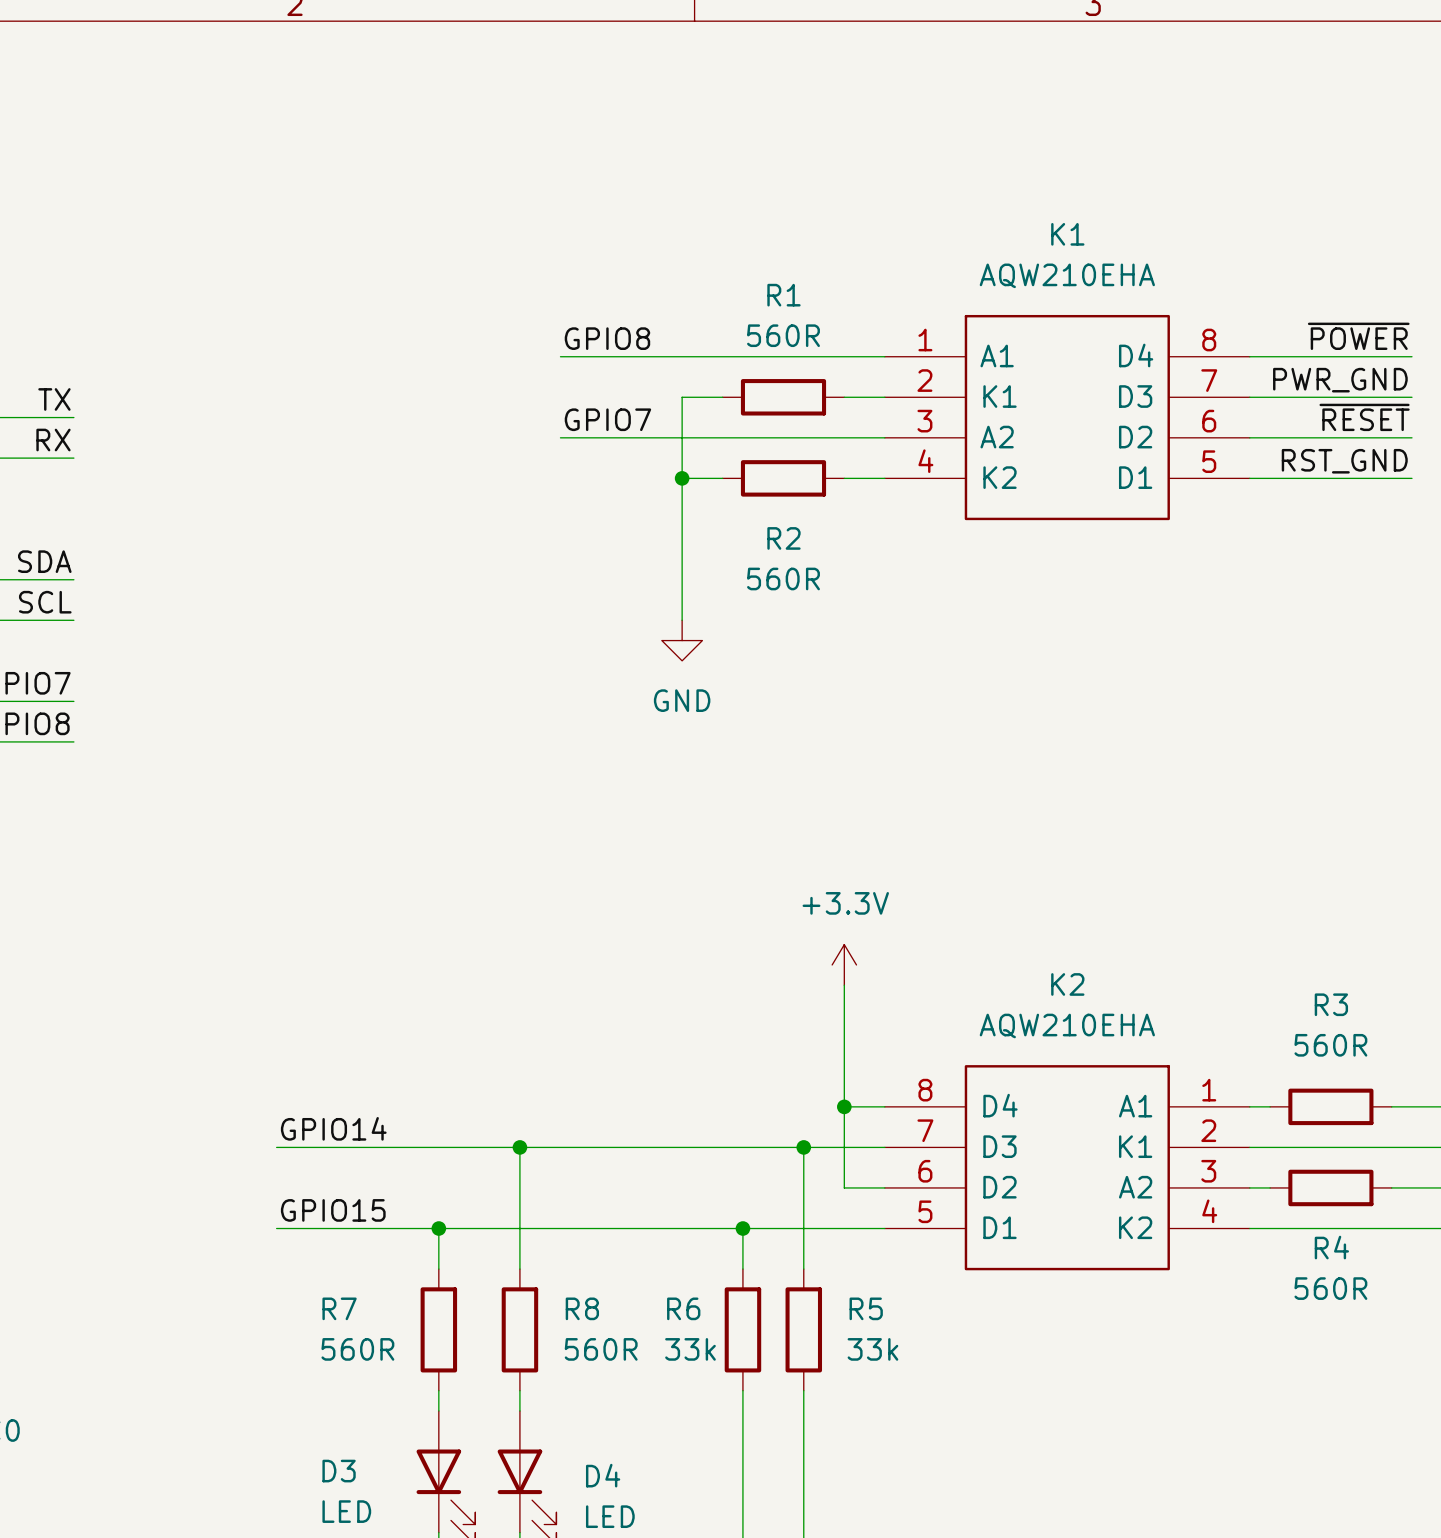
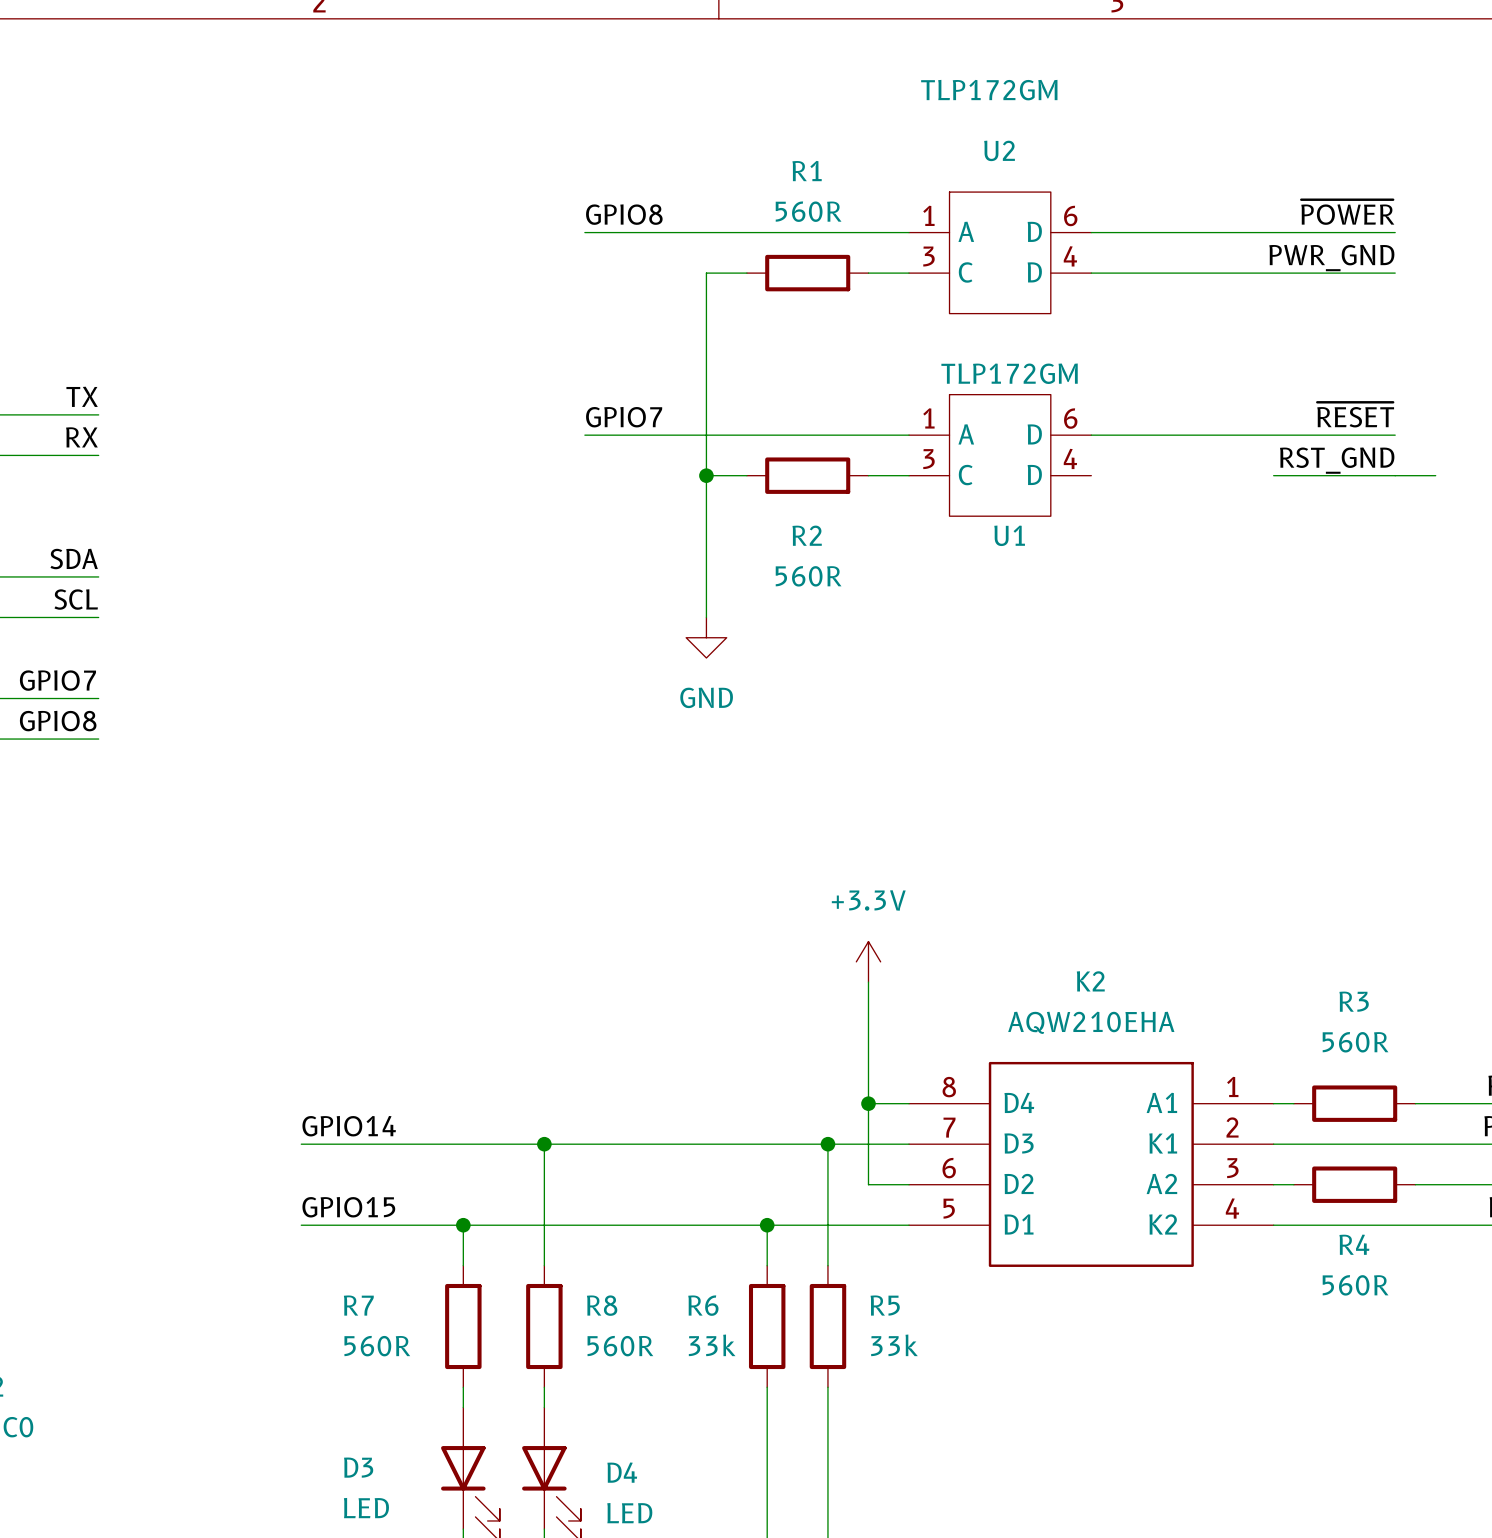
wire: none -> (1091, 232) (1395, 232)
U2: none -> TLP172GM (1000, 252)
wire: none -> (1091, 273) (1395, 273)
label position: ~{POWER} (1358, 336) -> ~{POWER} (1347, 212)
label position: GPIO8 (607, 338) -> GPIO8 (624, 214)
wire: (560, 356) (884, 356) -> (584, 232) (909, 232)
wire: (1249, 356) (1411, 356) -> none
label position: PWR_GND (1340, 380) -> PWR_GND (1331, 258)
wire: (682, 397) (722, 397) -> (706, 394) (706, 273) (746, 273)
R1 position: (783, 397) -> (807, 273)
wire: (844, 397) (884, 397) -> (868, 273) (909, 273)
wire: (1249, 397) (1411, 397) -> none
K1: AQW210EHA (1067, 417) -> none
label position: ~{RESET} (1364, 417) -> ~{RESET} (1355, 414)
wire: none -> (1091, 435) (1273, 435)
wire: (1371, 437) (1411, 437) -> none
U1: none -> TLP172GM (1000, 455)
label position: RST_GND (1344, 461) -> RST_GND (1337, 460)

